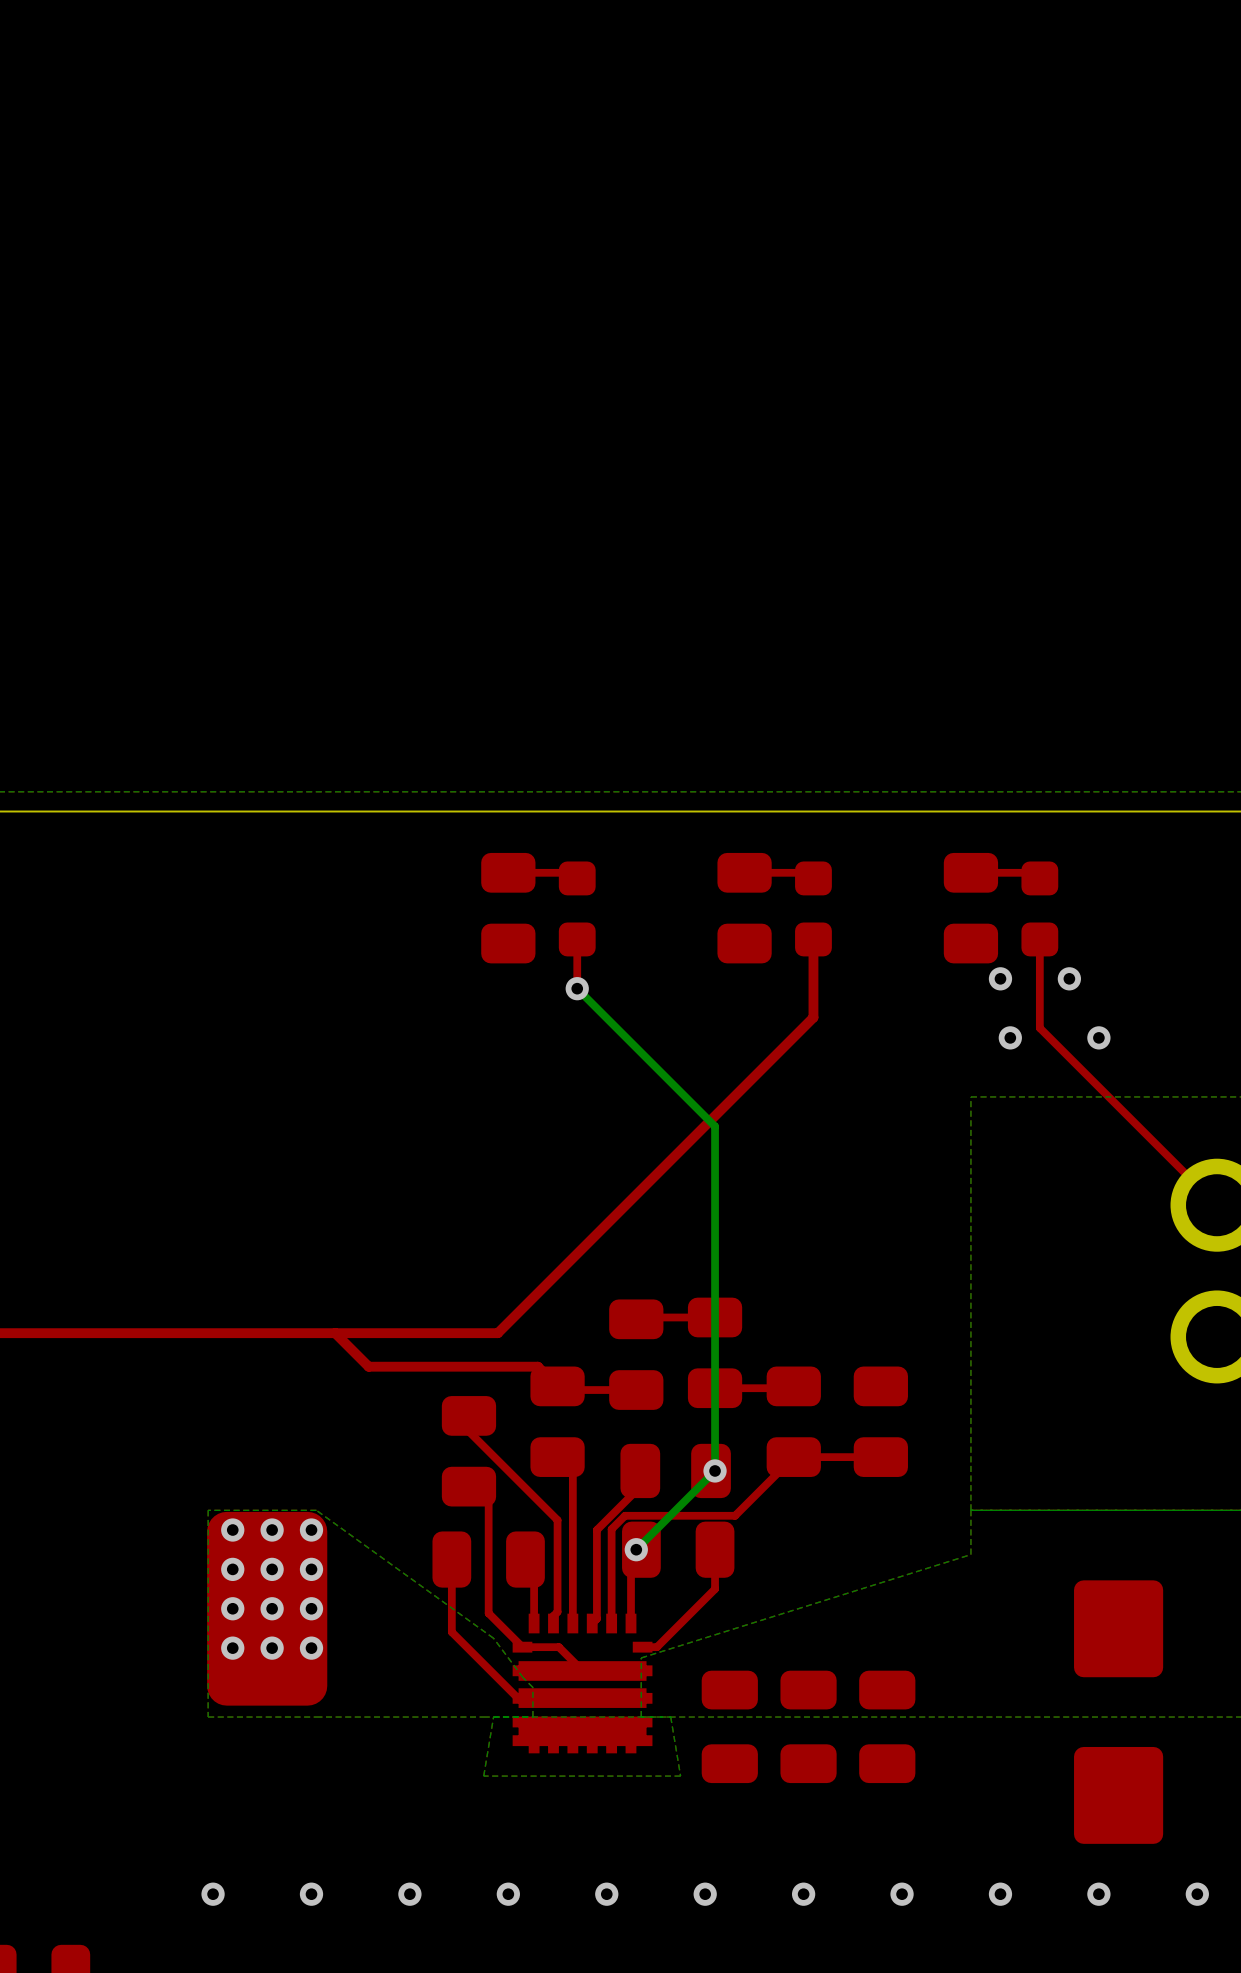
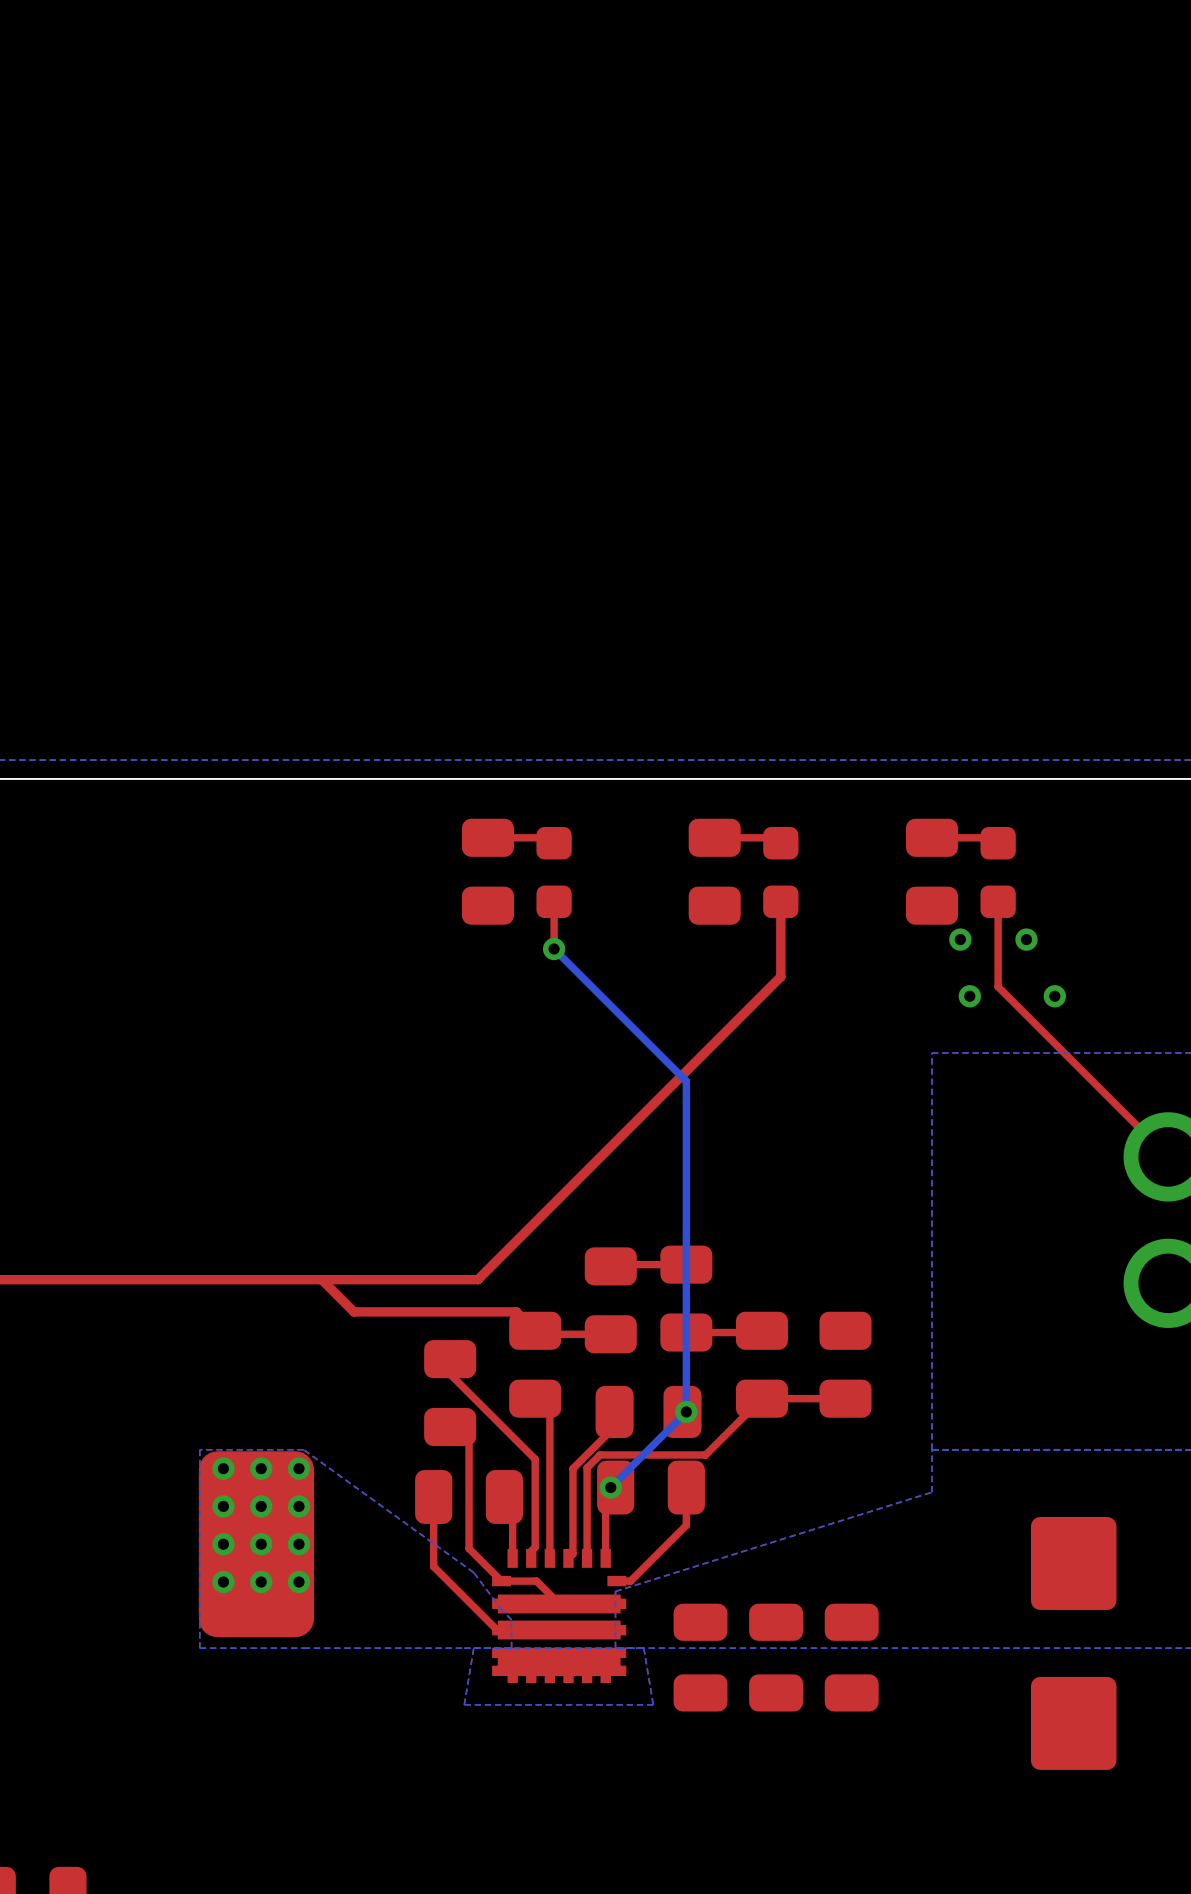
via: (213, 1894) -> none
via: (311, 1894) -> none
via: (409, 1894) -> none
via: (508, 1894) -> none
via: (606, 1894) -> none
via: (705, 1894) -> none
via: (803, 1894) -> none
via: (902, 1894) -> none
via: (1000, 1894) -> none
via: (1098, 1894) -> none
via: (1197, 1894) -> none

